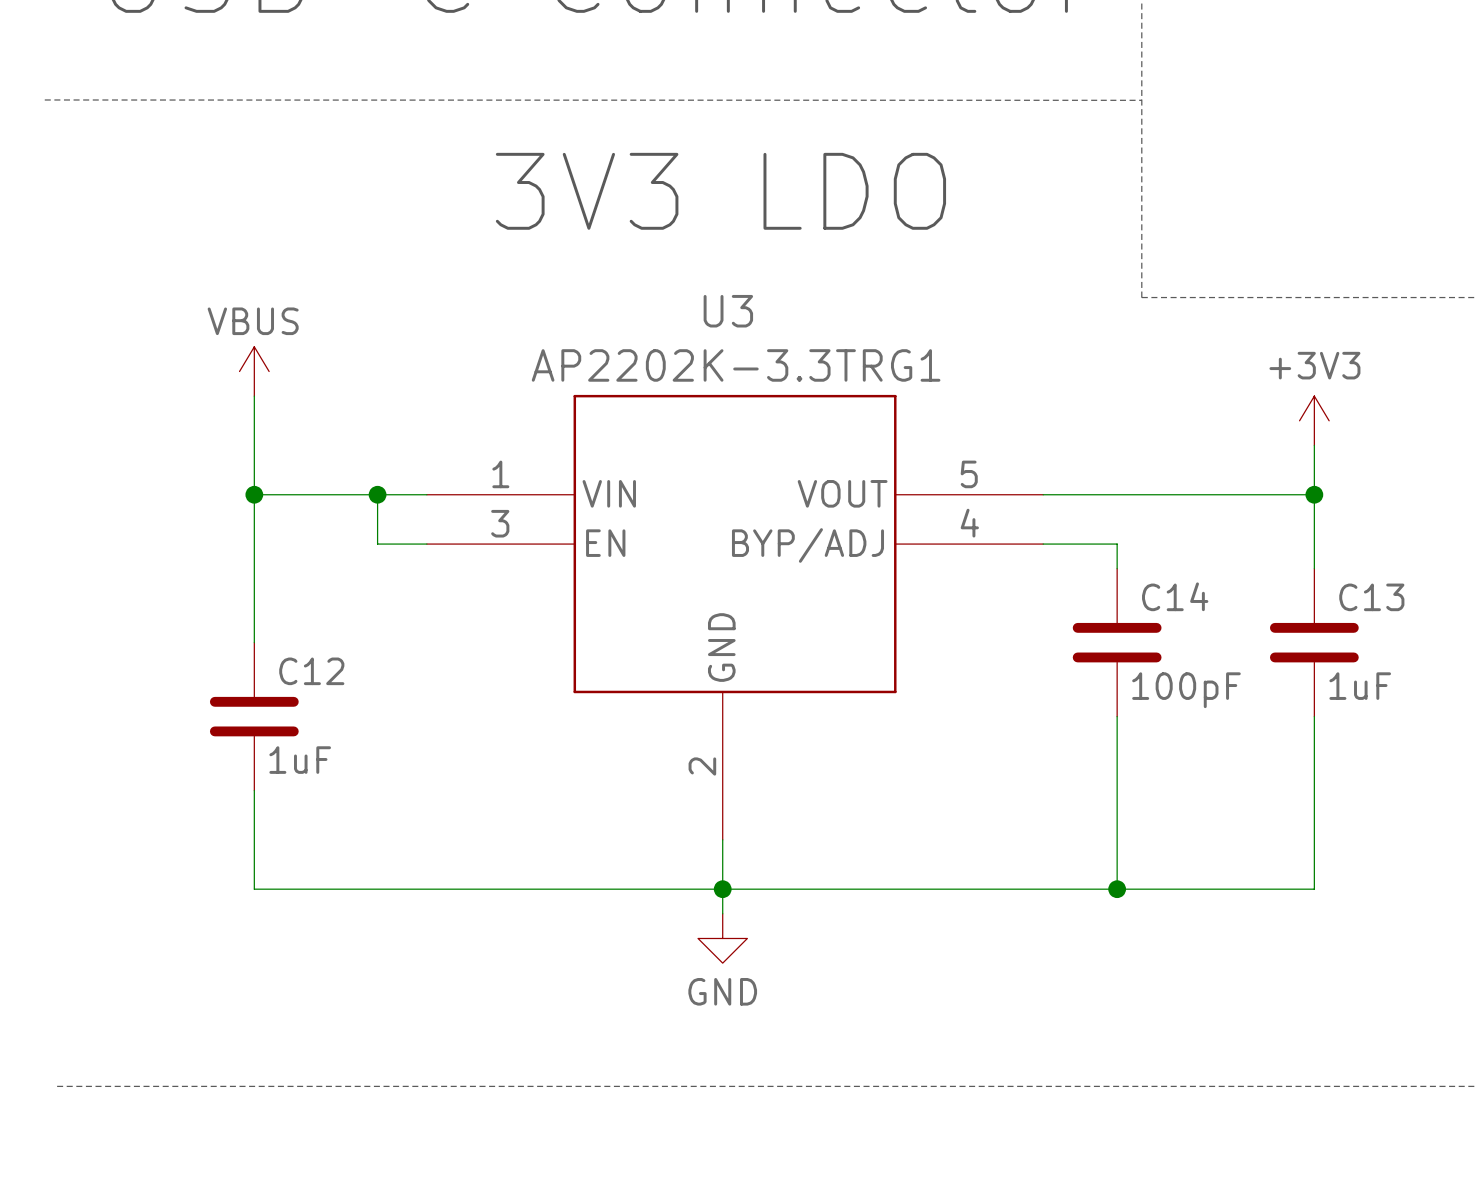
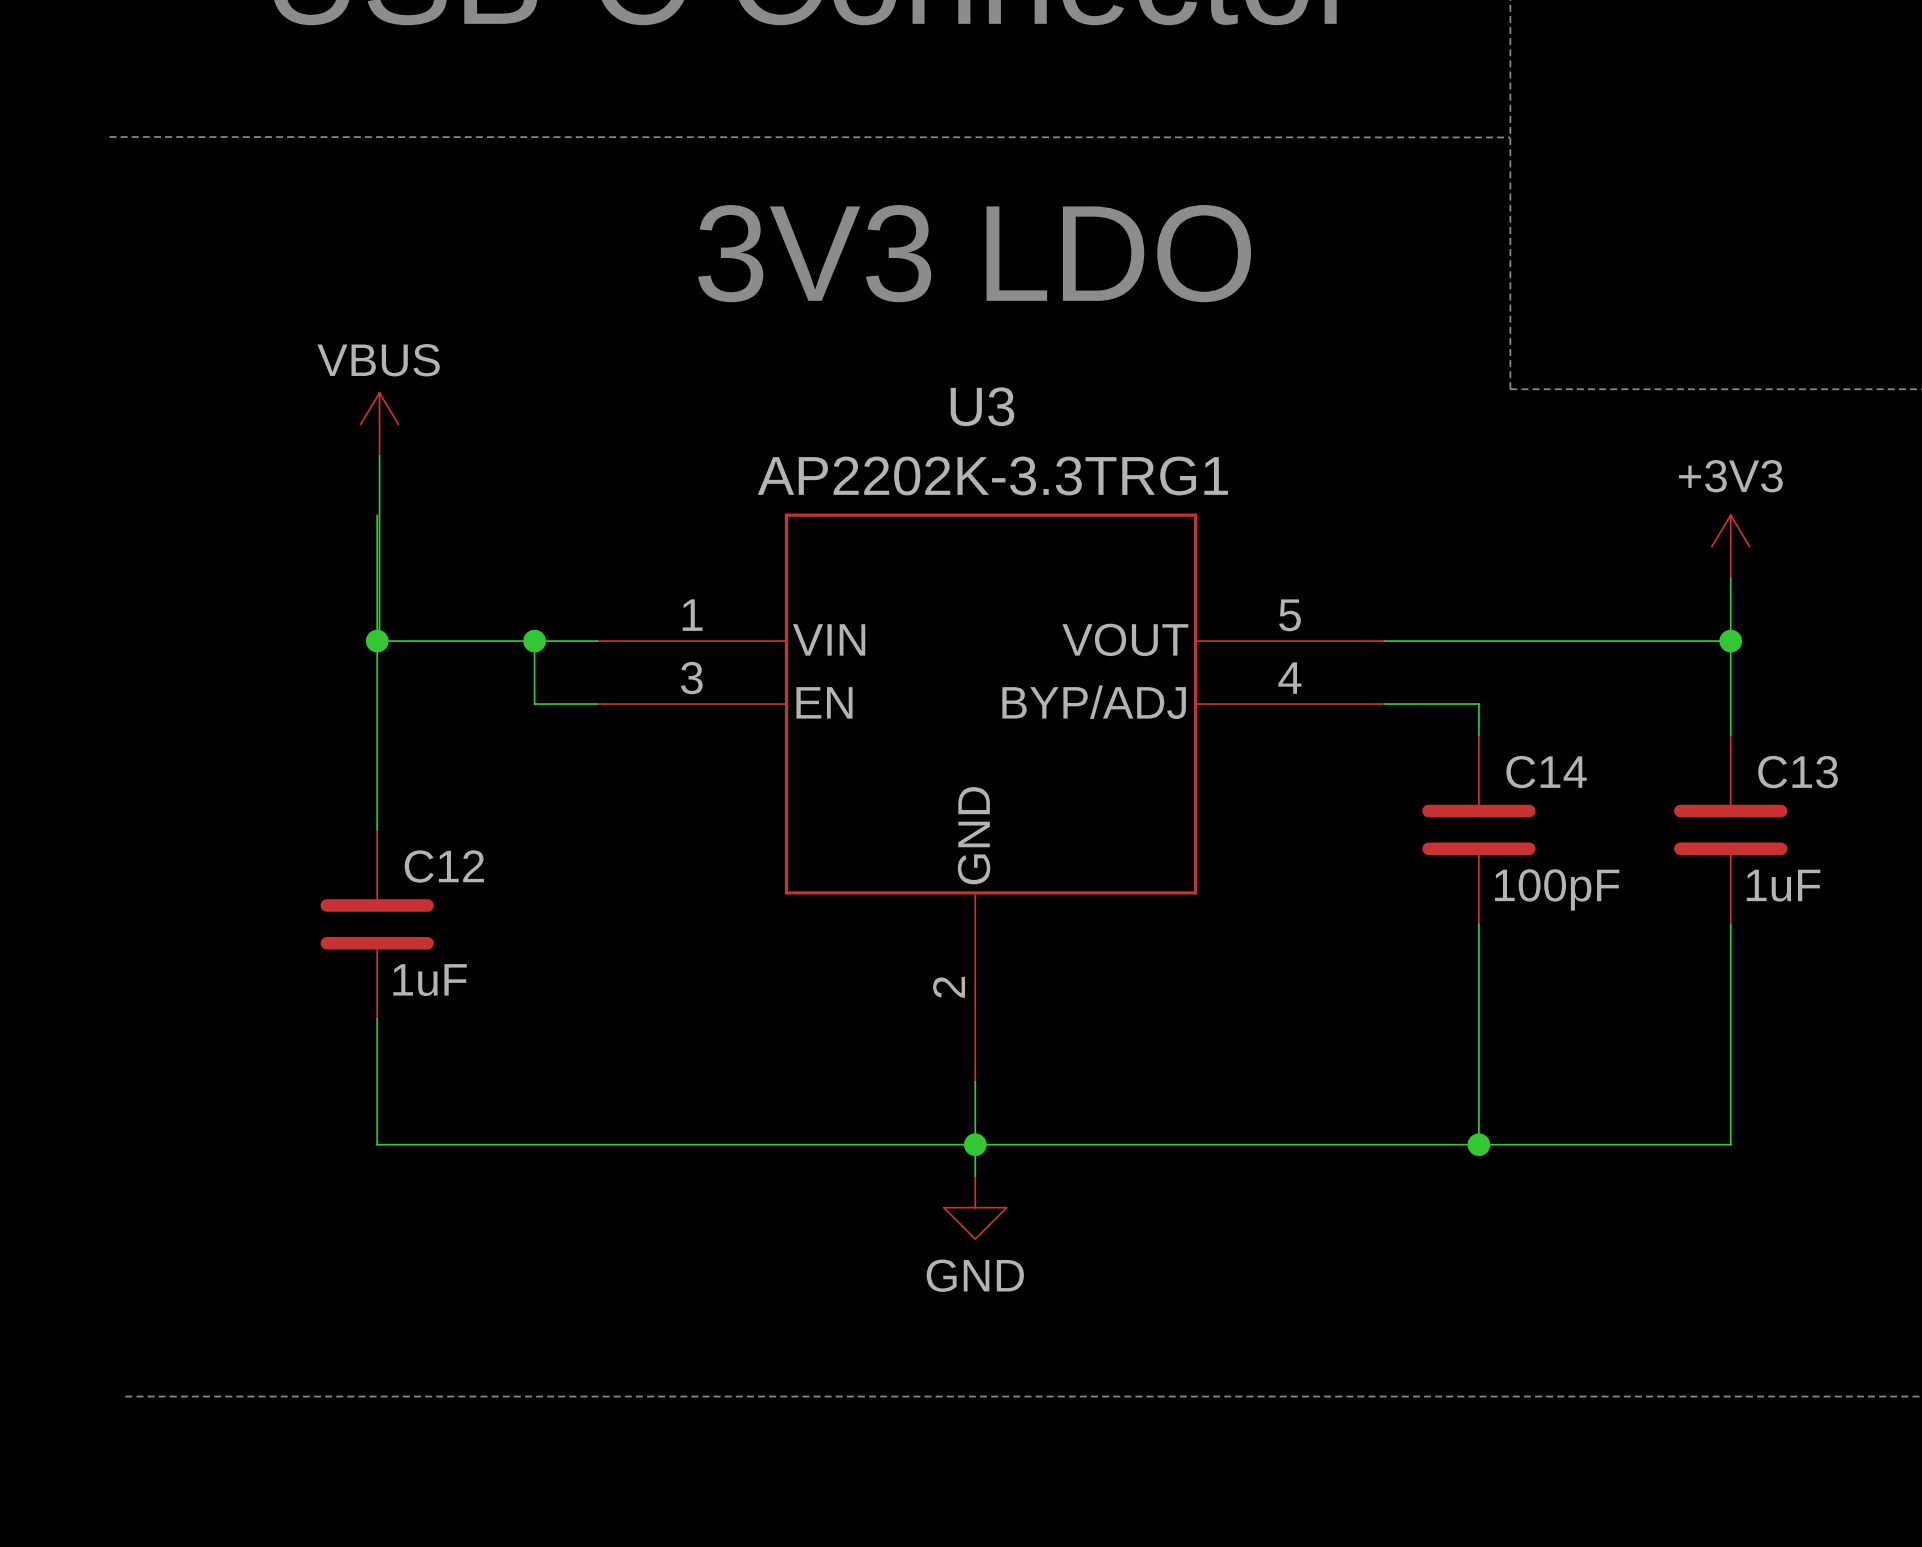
wire: none -> (379, 455) (379, 641)
power symbol position: VBUS (254, 371) -> VBUS (379, 424)

